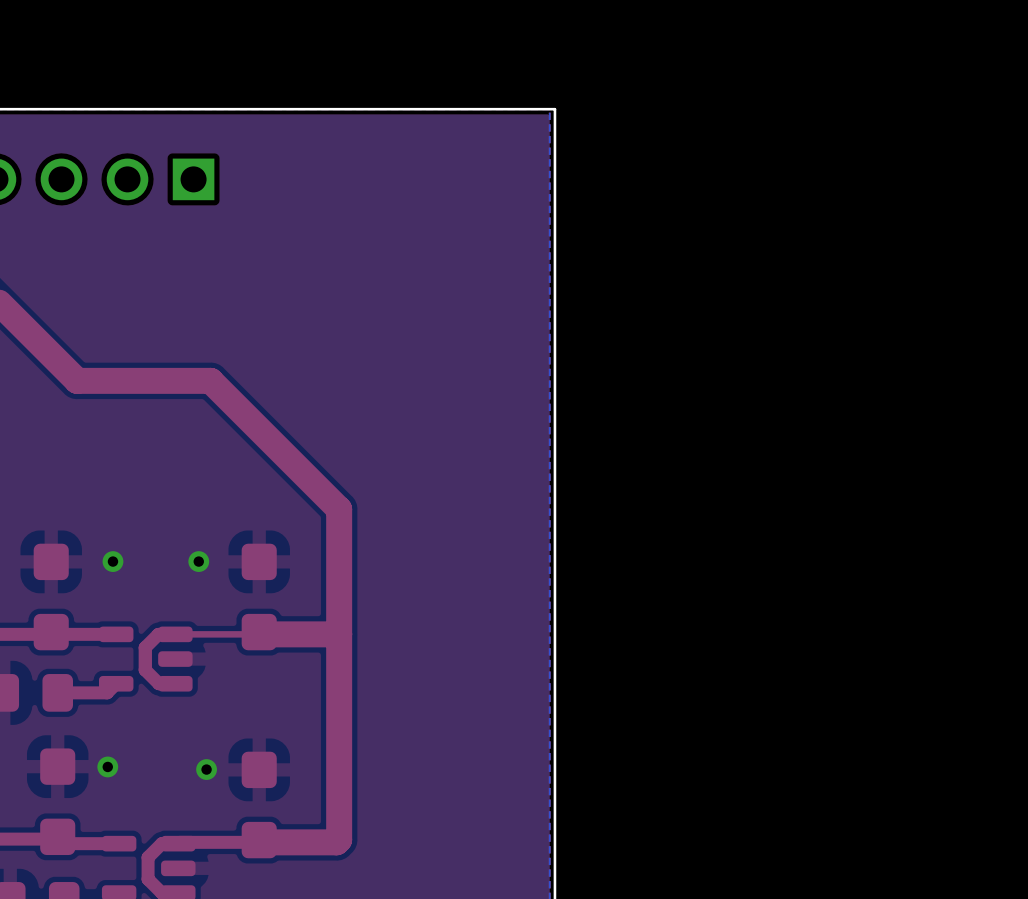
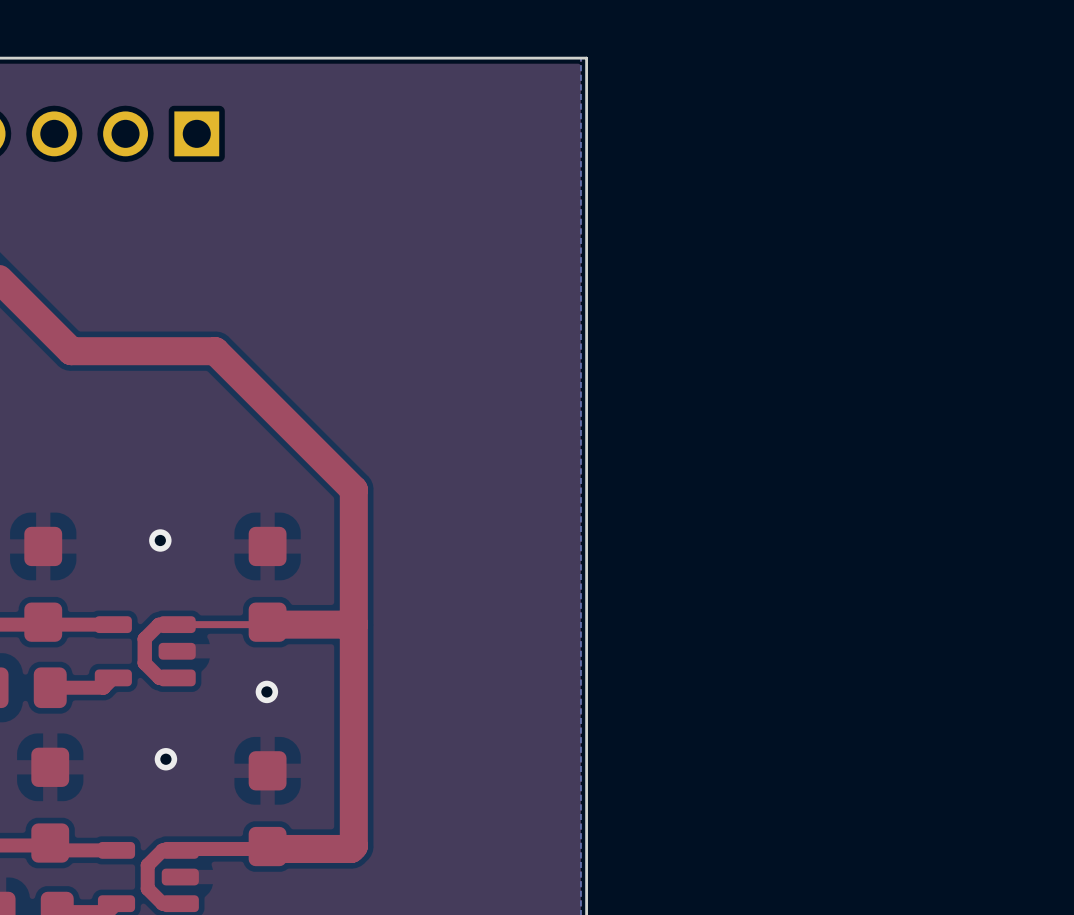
via: none -> (160, 540)
via: (112, 561) -> none
via: (198, 561) -> none
via: none -> (266, 691)
via: none -> (165, 759)
via: (107, 766) -> none
via: (206, 769) -> none

